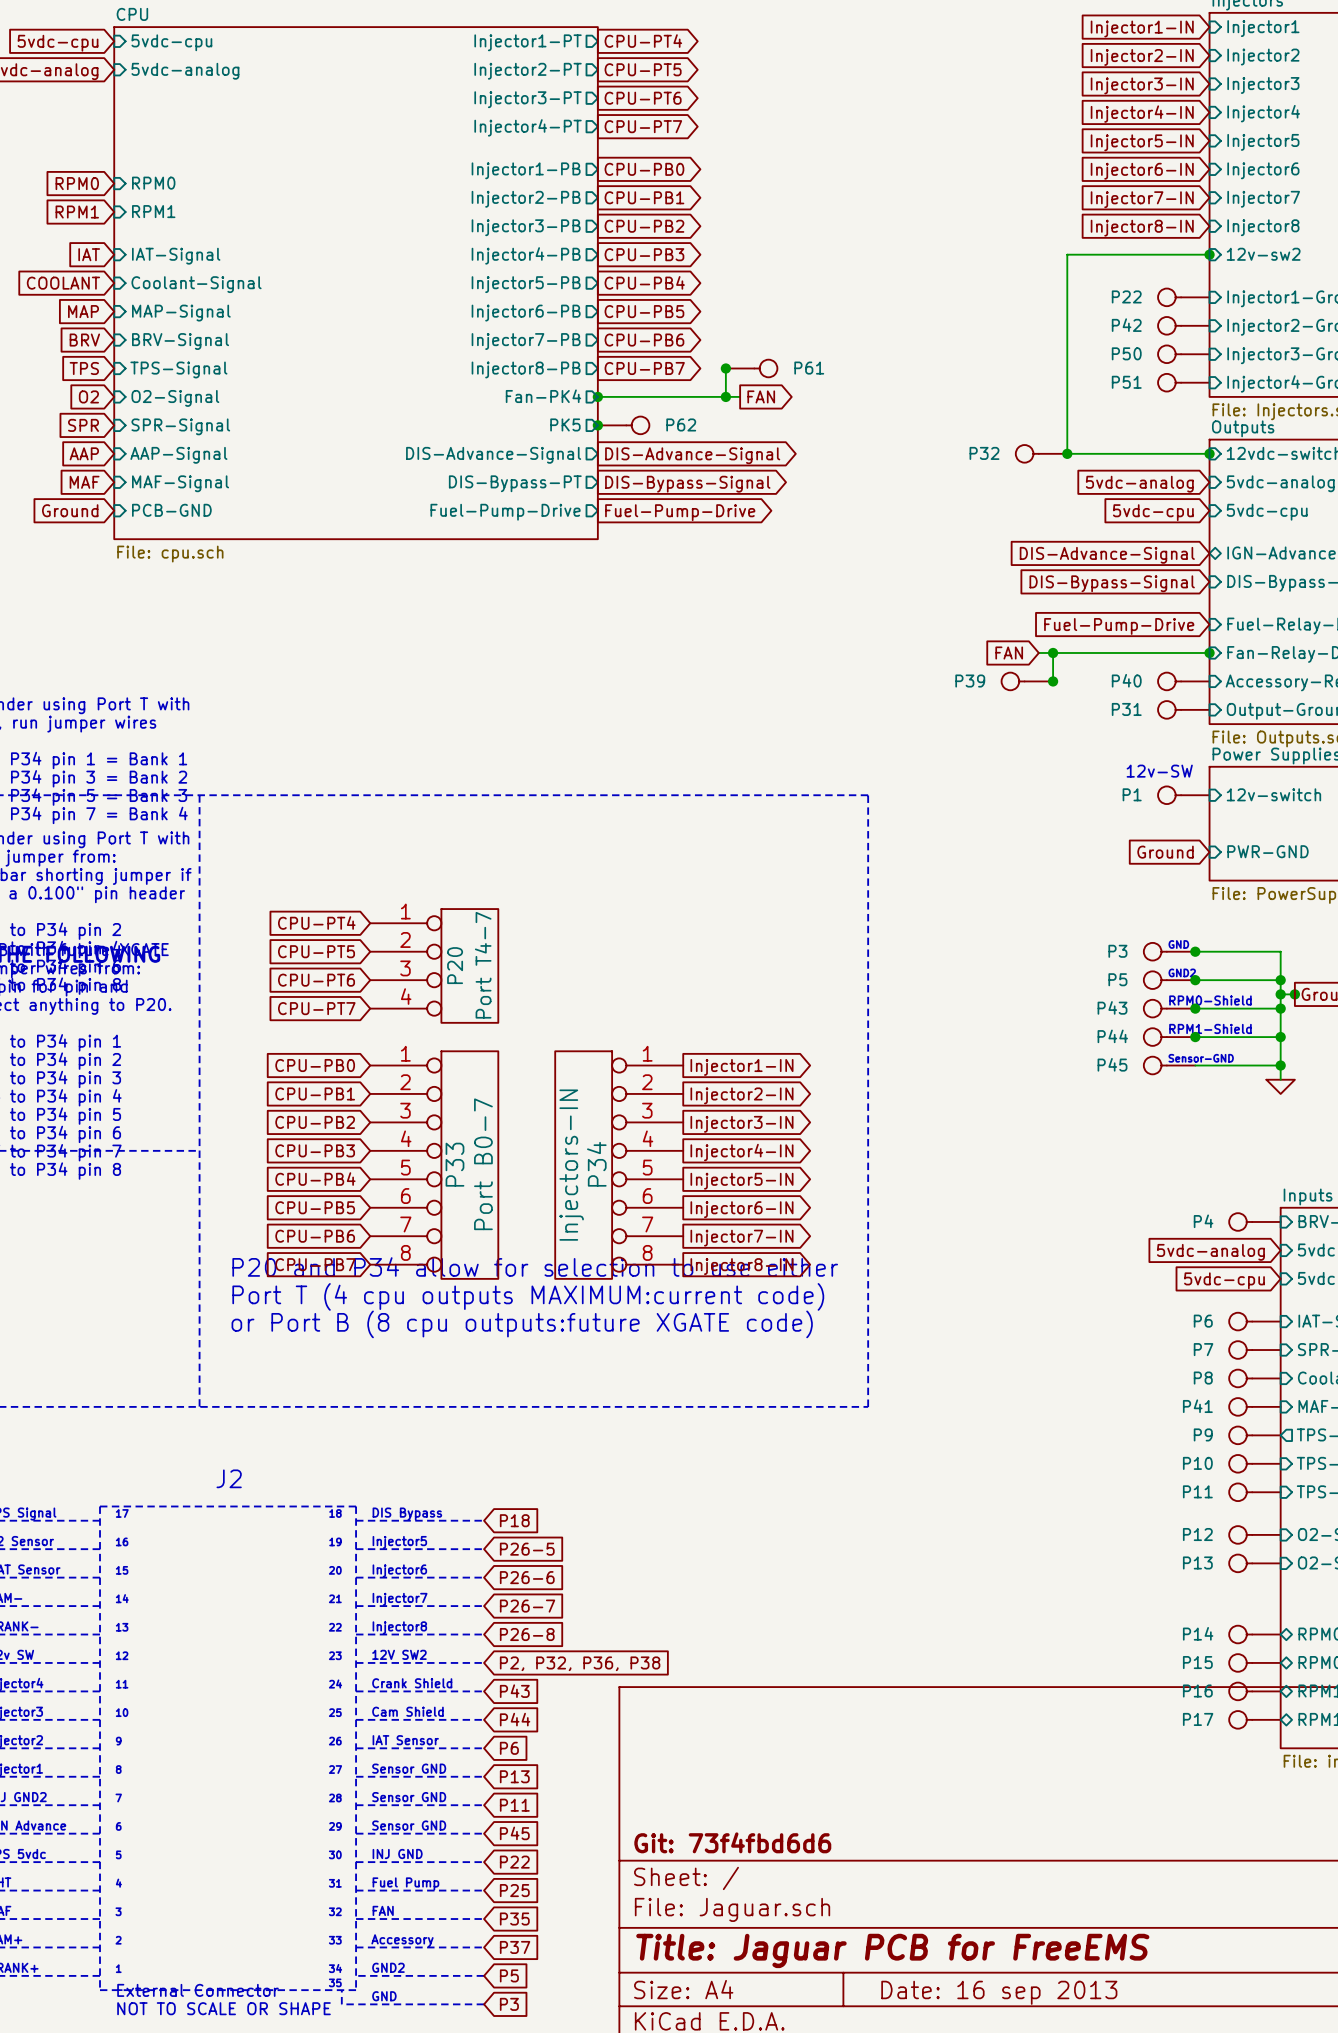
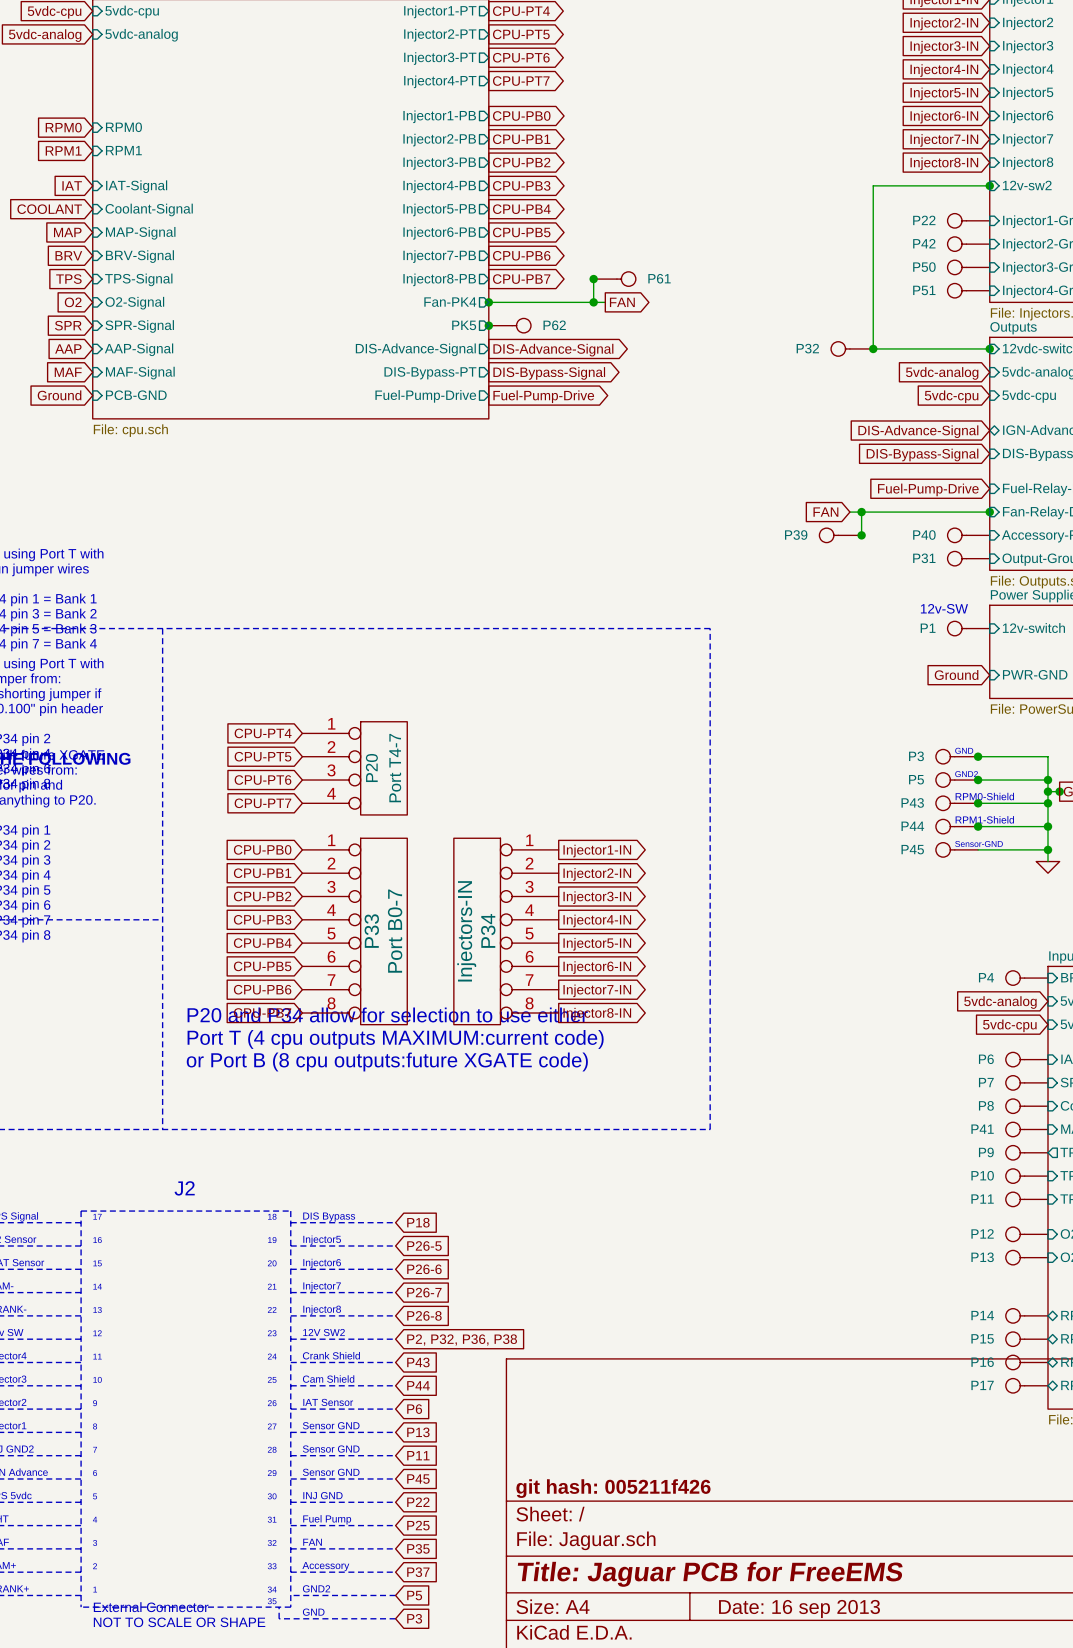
title block: Git: 73f4fbd6d6 (732, 1842) -> git hash: 005211f426 (613, 1488)

